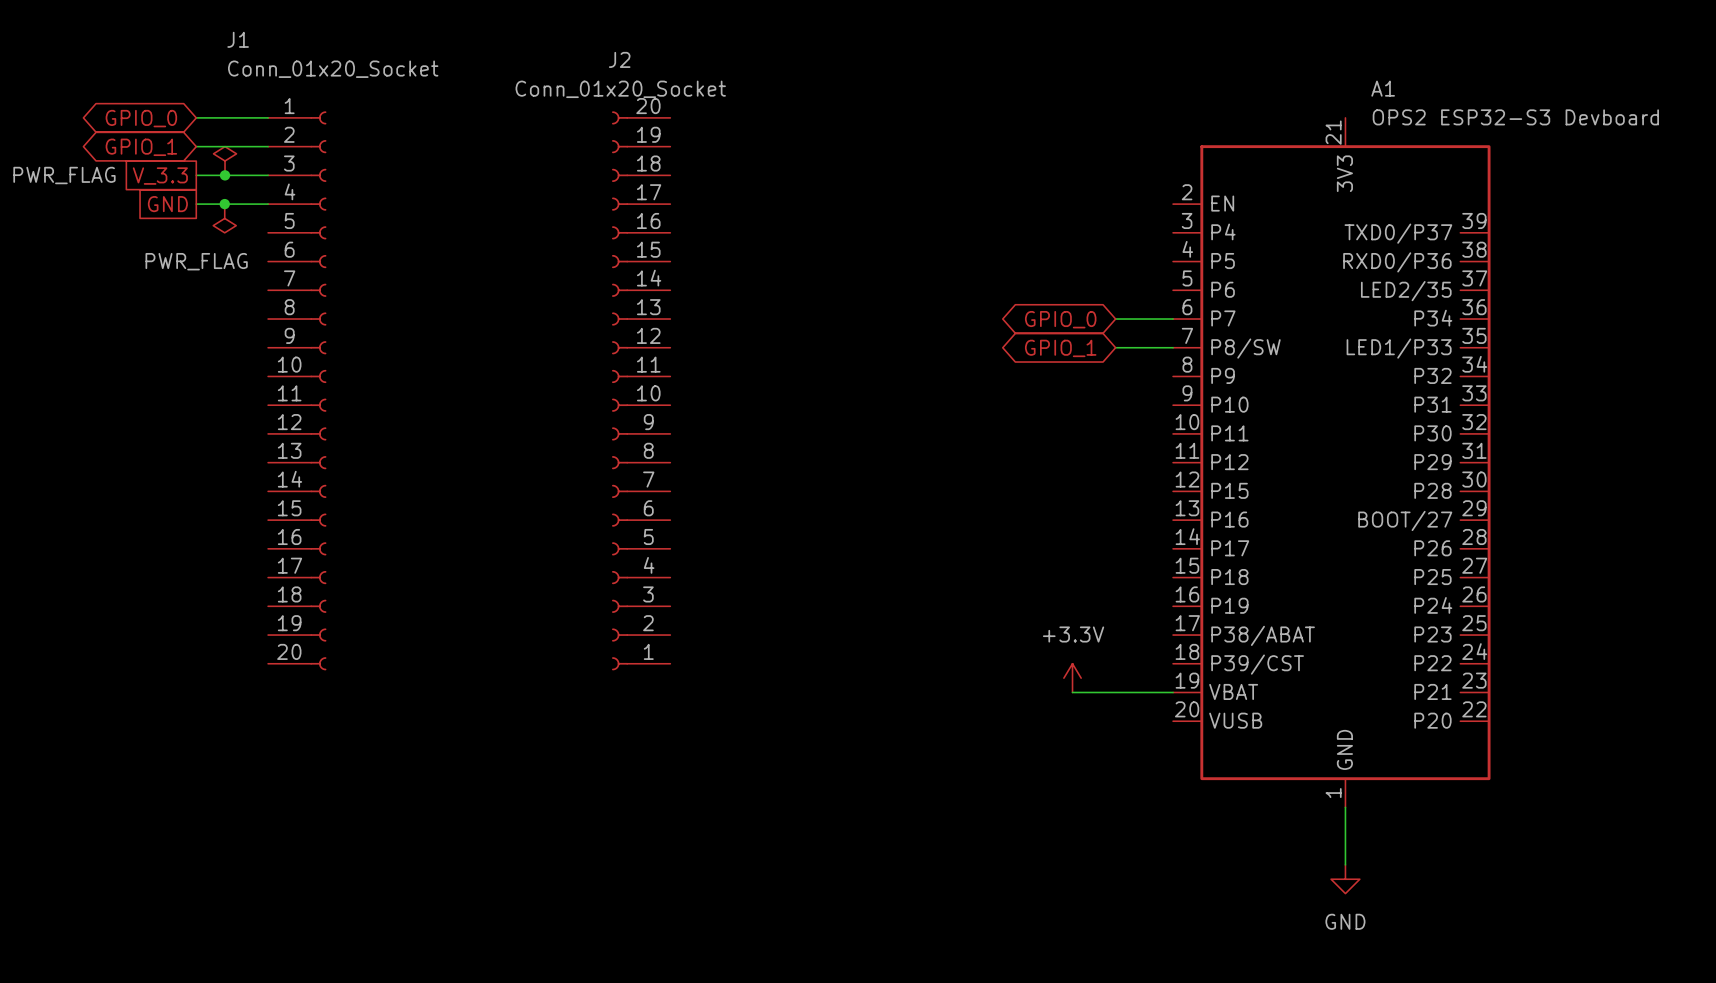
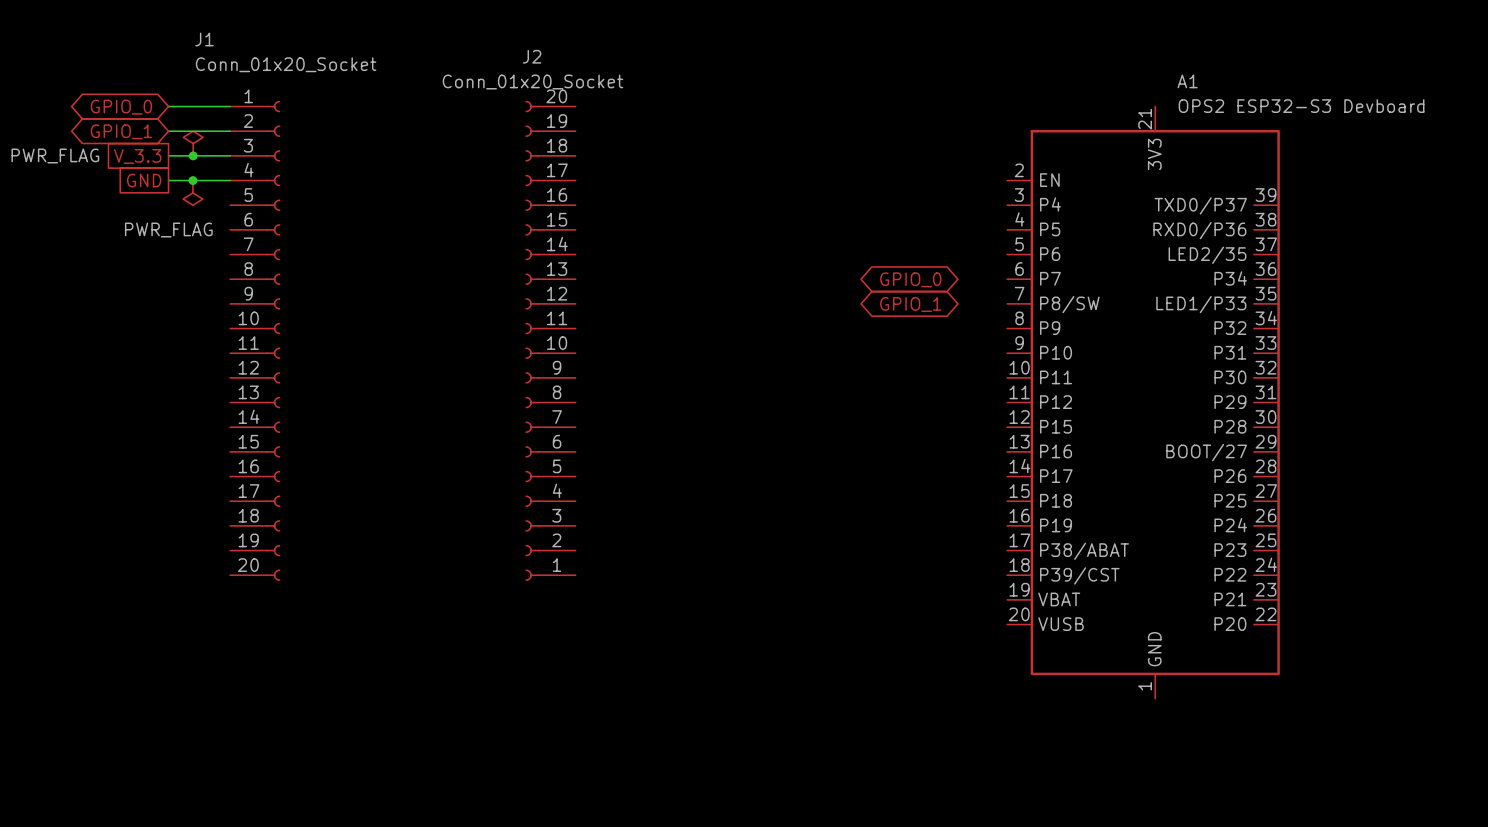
wire: (1115, 319) (1173, 319) -> none
wire: (1115, 347) (1173, 347) -> none
power symbol: +3.3V (1072, 678) -> none
wire: (1072, 692) (1173, 692) -> none
wire: (1345, 807) (1345, 864) -> none
power symbol: GND (1345, 879) -> none

